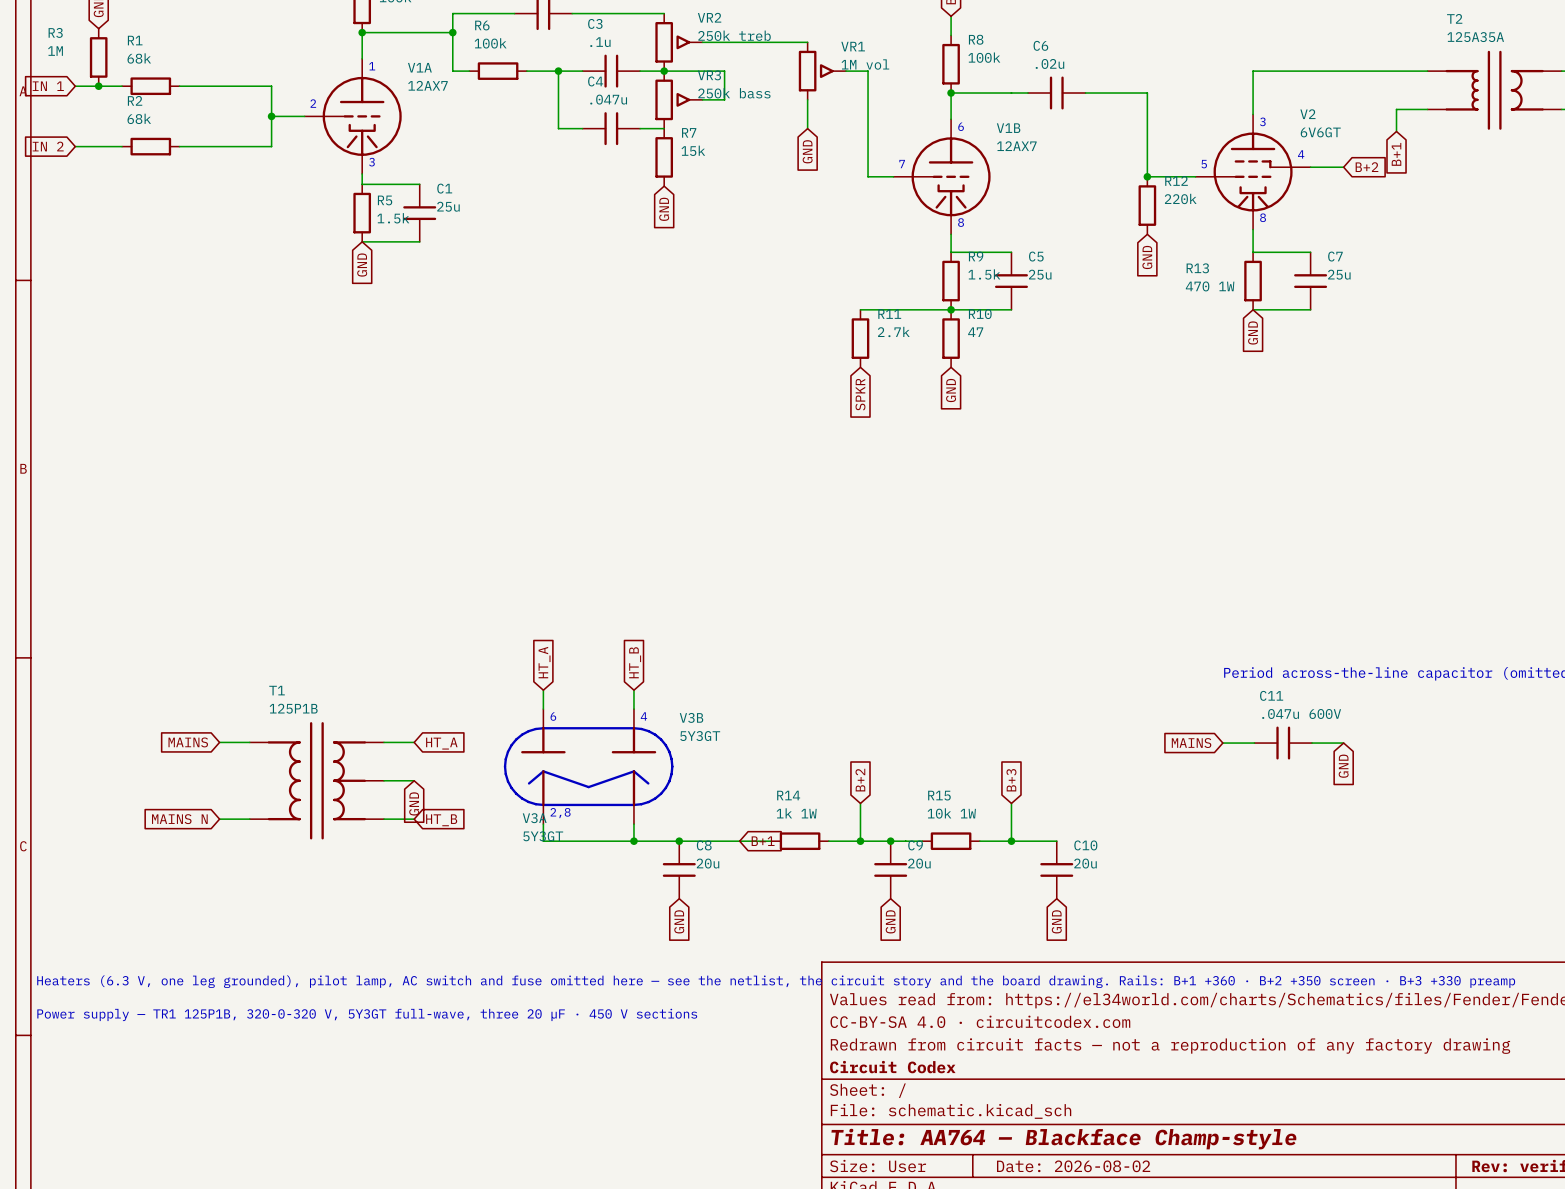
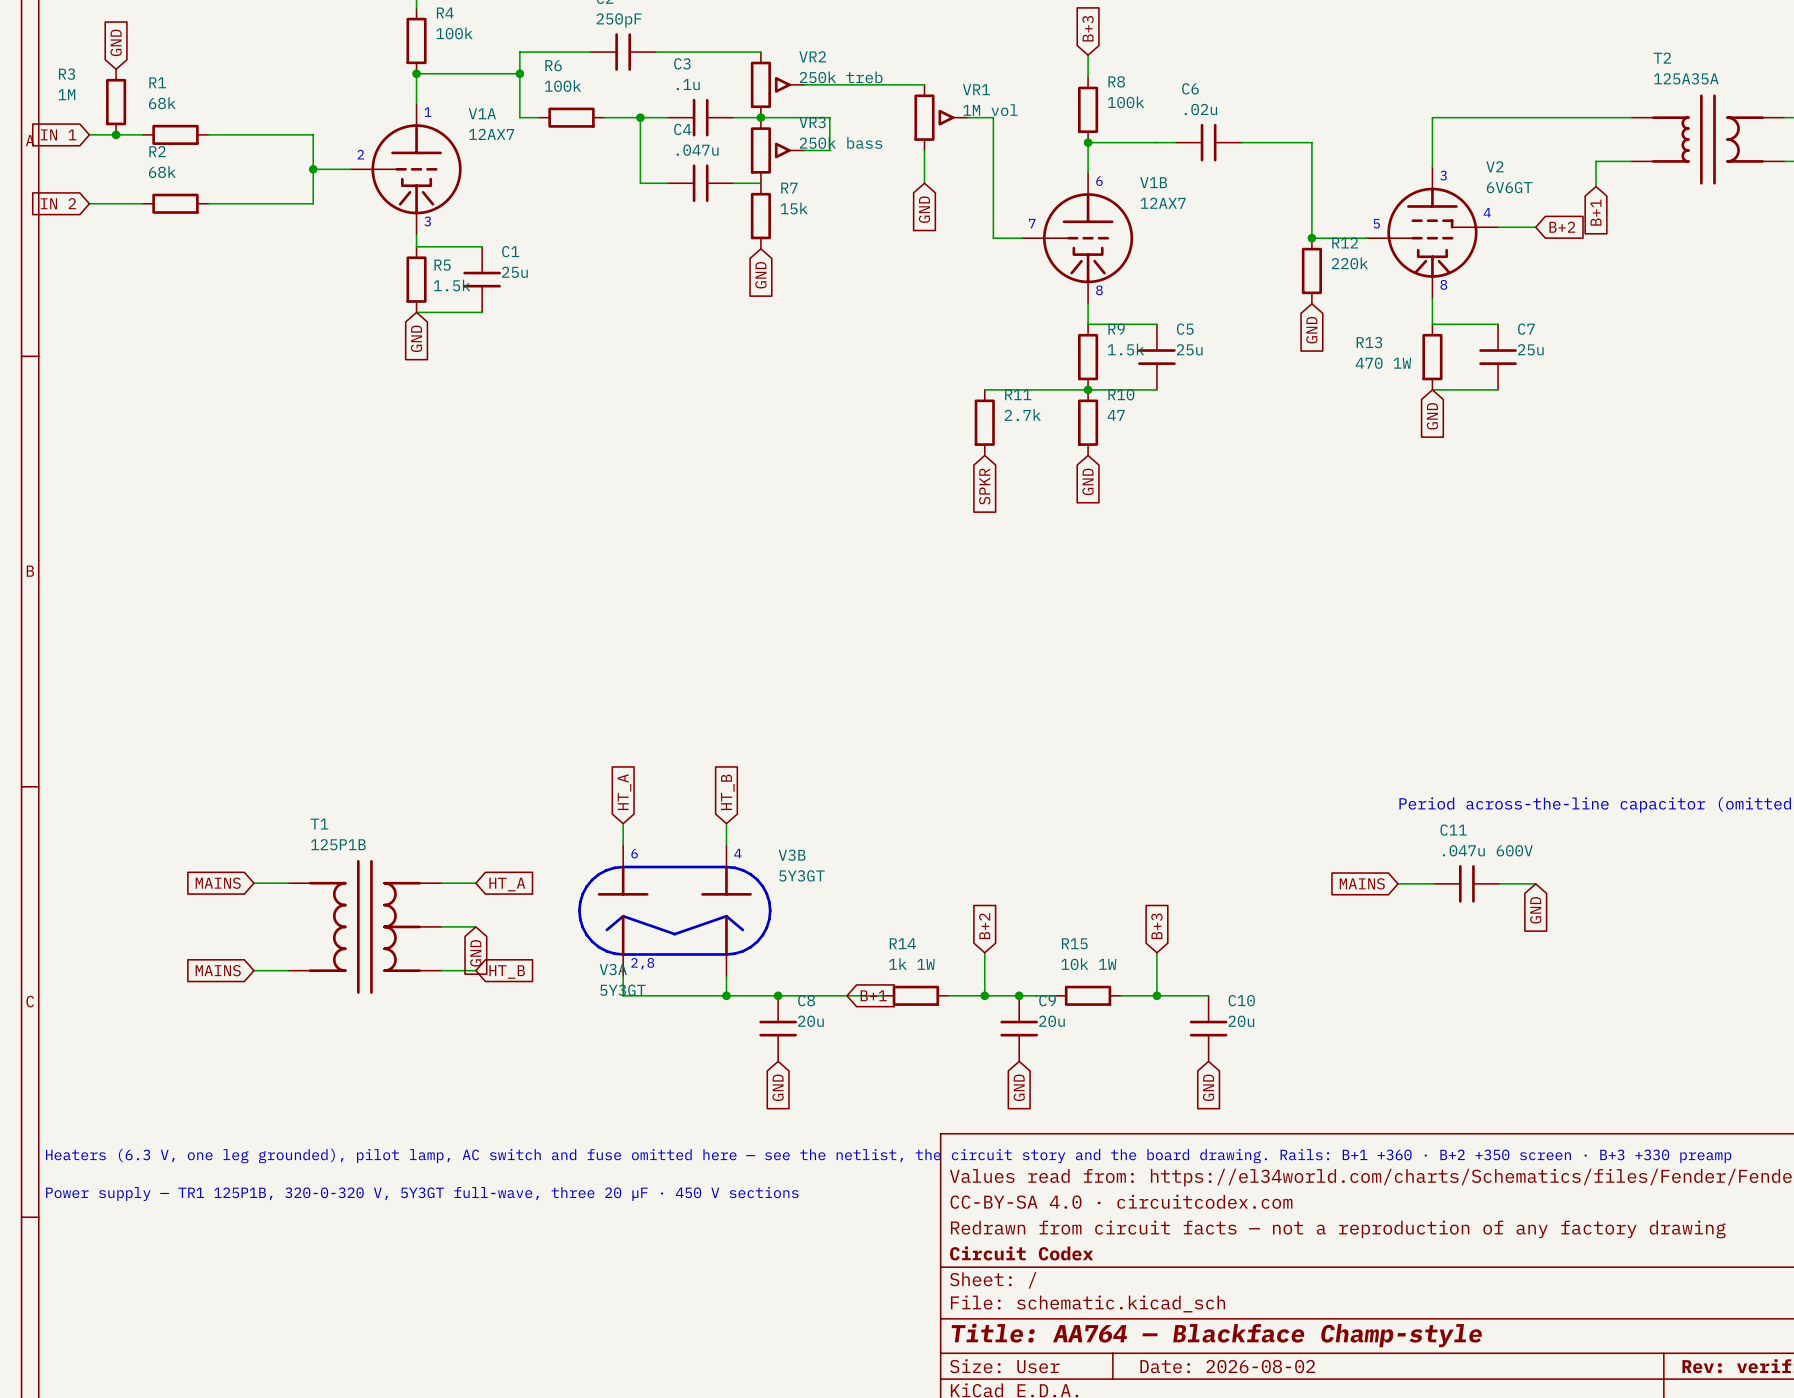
global label: MAINS N (179, 819) -> MAINS (218, 970)

